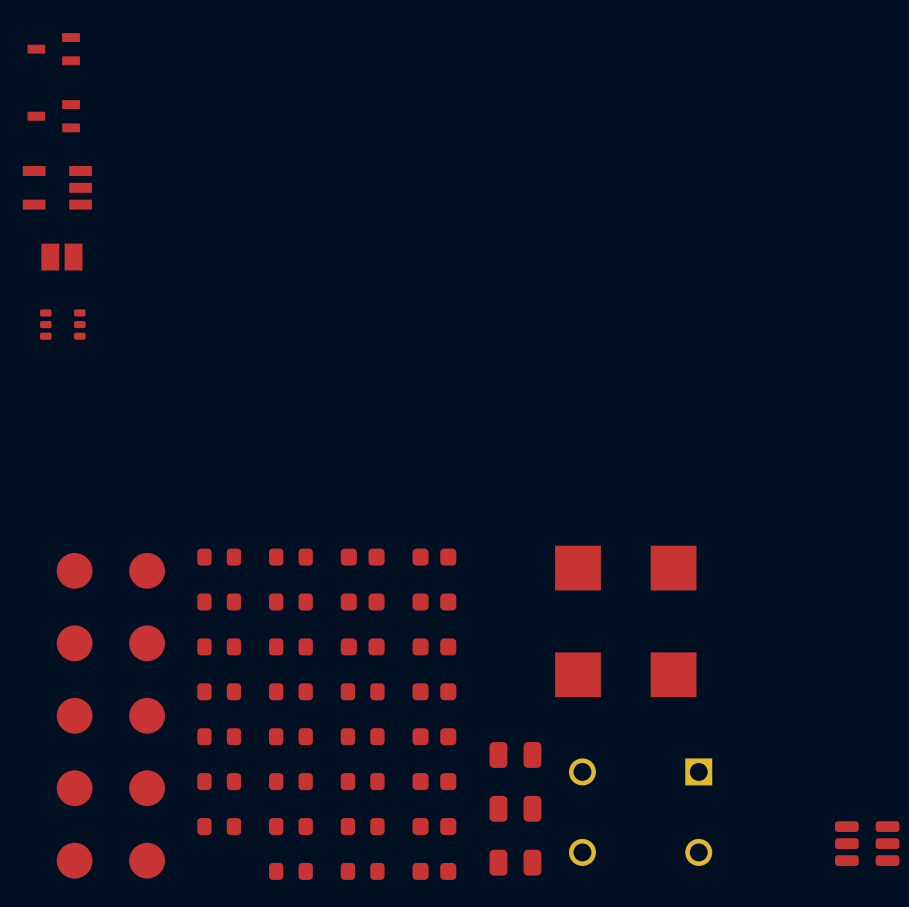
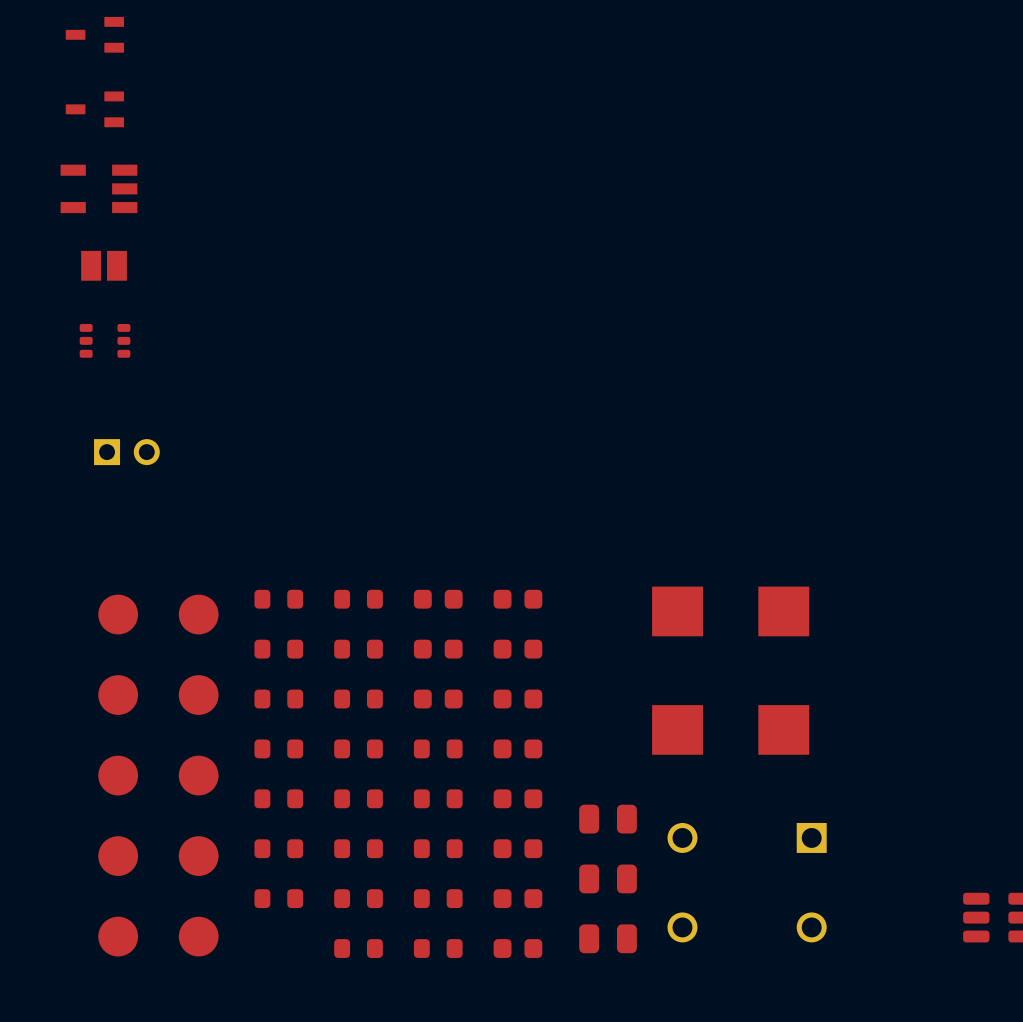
part: none -> (126, 452)

